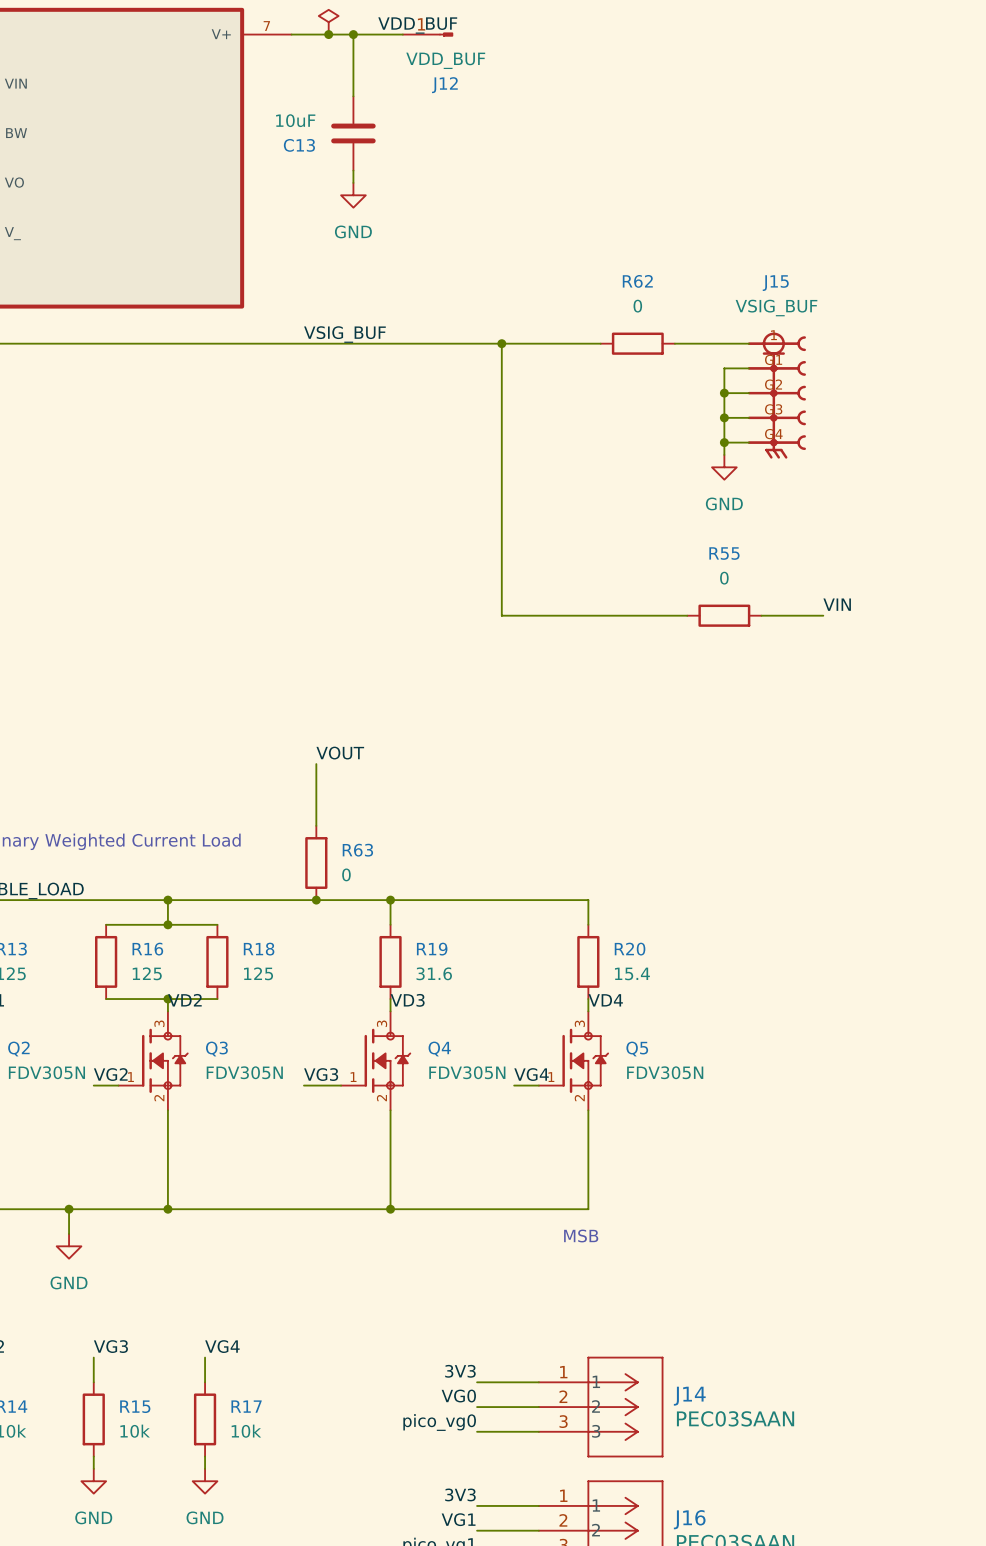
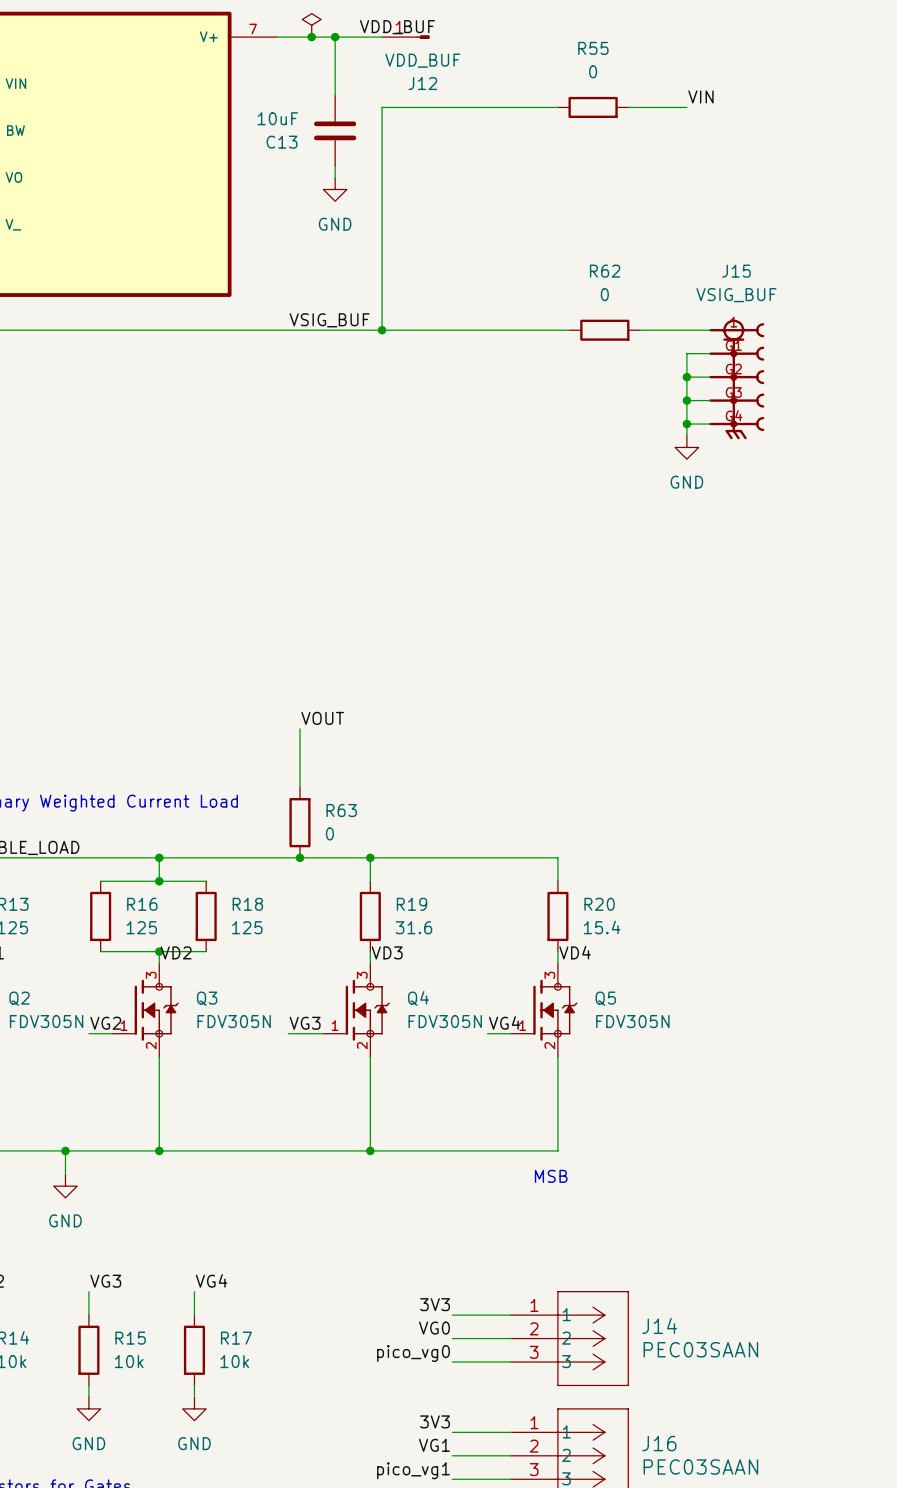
label: none -> VIN (700, 96)
wire: none -> (557, 107) (382, 107) (382, 330)
wire: none -> (628, 107) (686, 107)
junction: none -> (382, 330)
wire: (501, 343) (501, 615) (687, 615) -> none
junction: (501, 343) -> none
label: VIN (837, 604) -> none
R55 position: (724, 615) -> (593, 107)
wire: (761, 615) (823, 615) -> none

